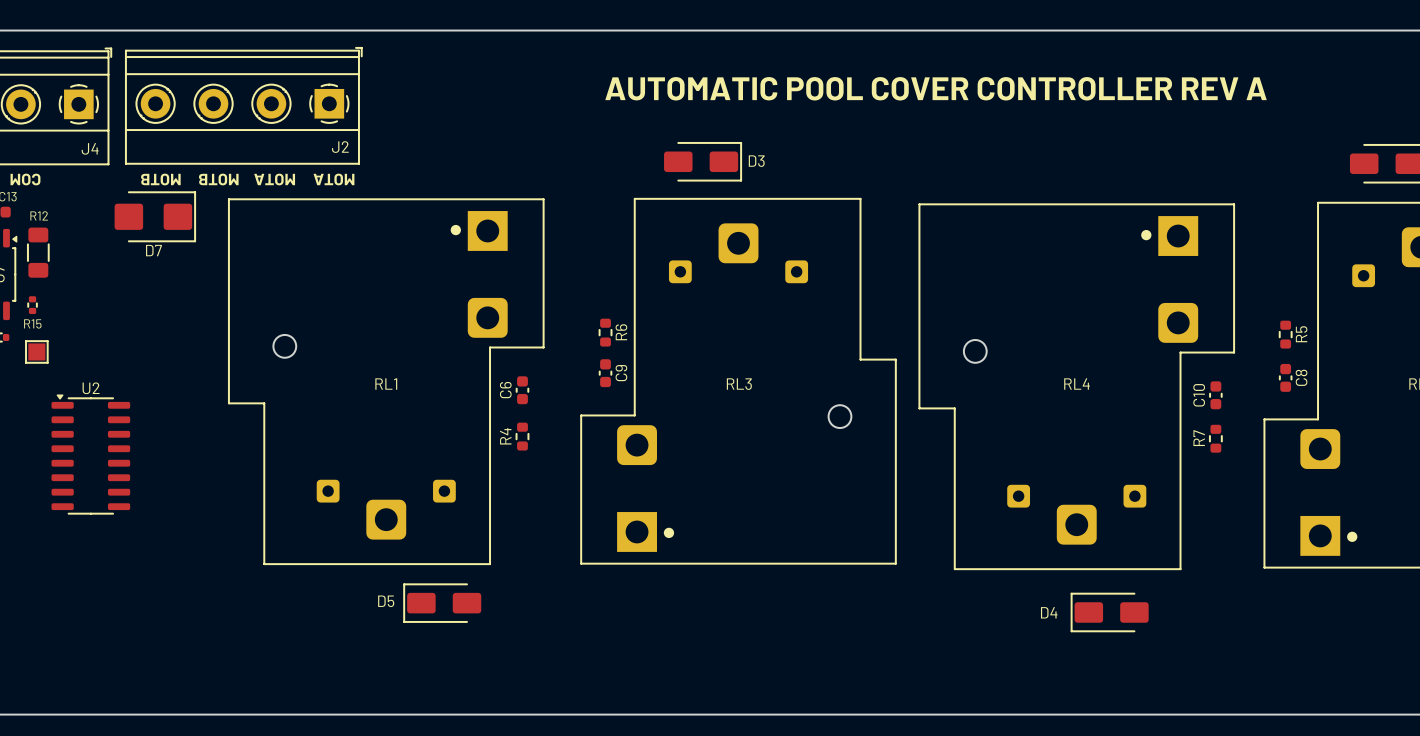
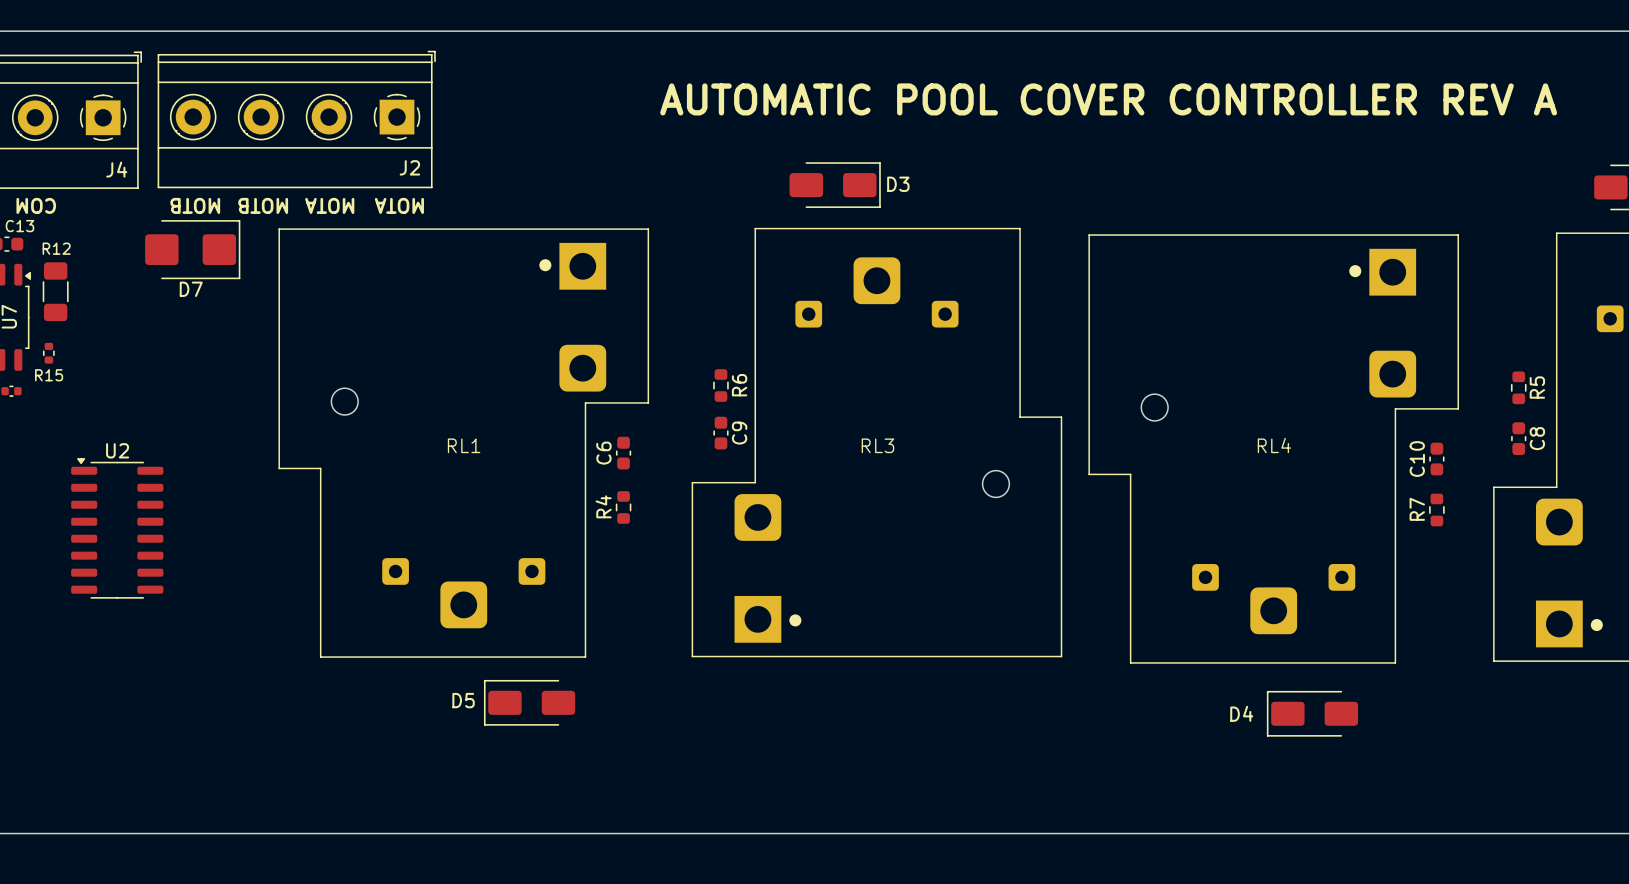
part: (36, 351) -> none

